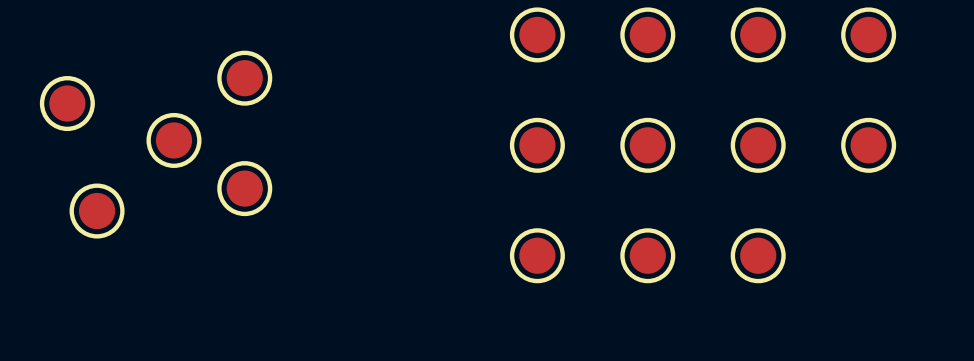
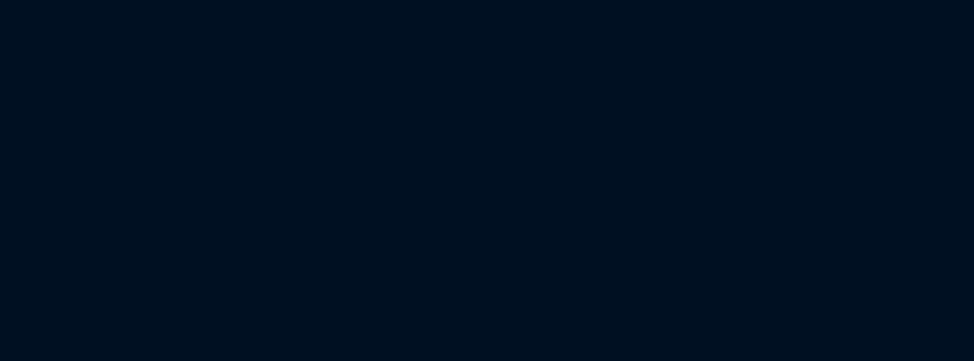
part: (537, 34) -> none
part: (647, 34) -> none
part: (758, 34) -> none
part: (868, 34) -> none
part: (244, 78) -> none
part: (67, 103) -> none
part: (173, 140) -> none
part: (537, 145) -> none
part: (647, 145) -> none
part: (758, 145) -> none
part: (868, 145) -> none
part: (244, 188) -> none
part: (97, 211) -> none
part: (537, 255) -> none
part: (647, 255) -> none
part: (758, 255) -> none

